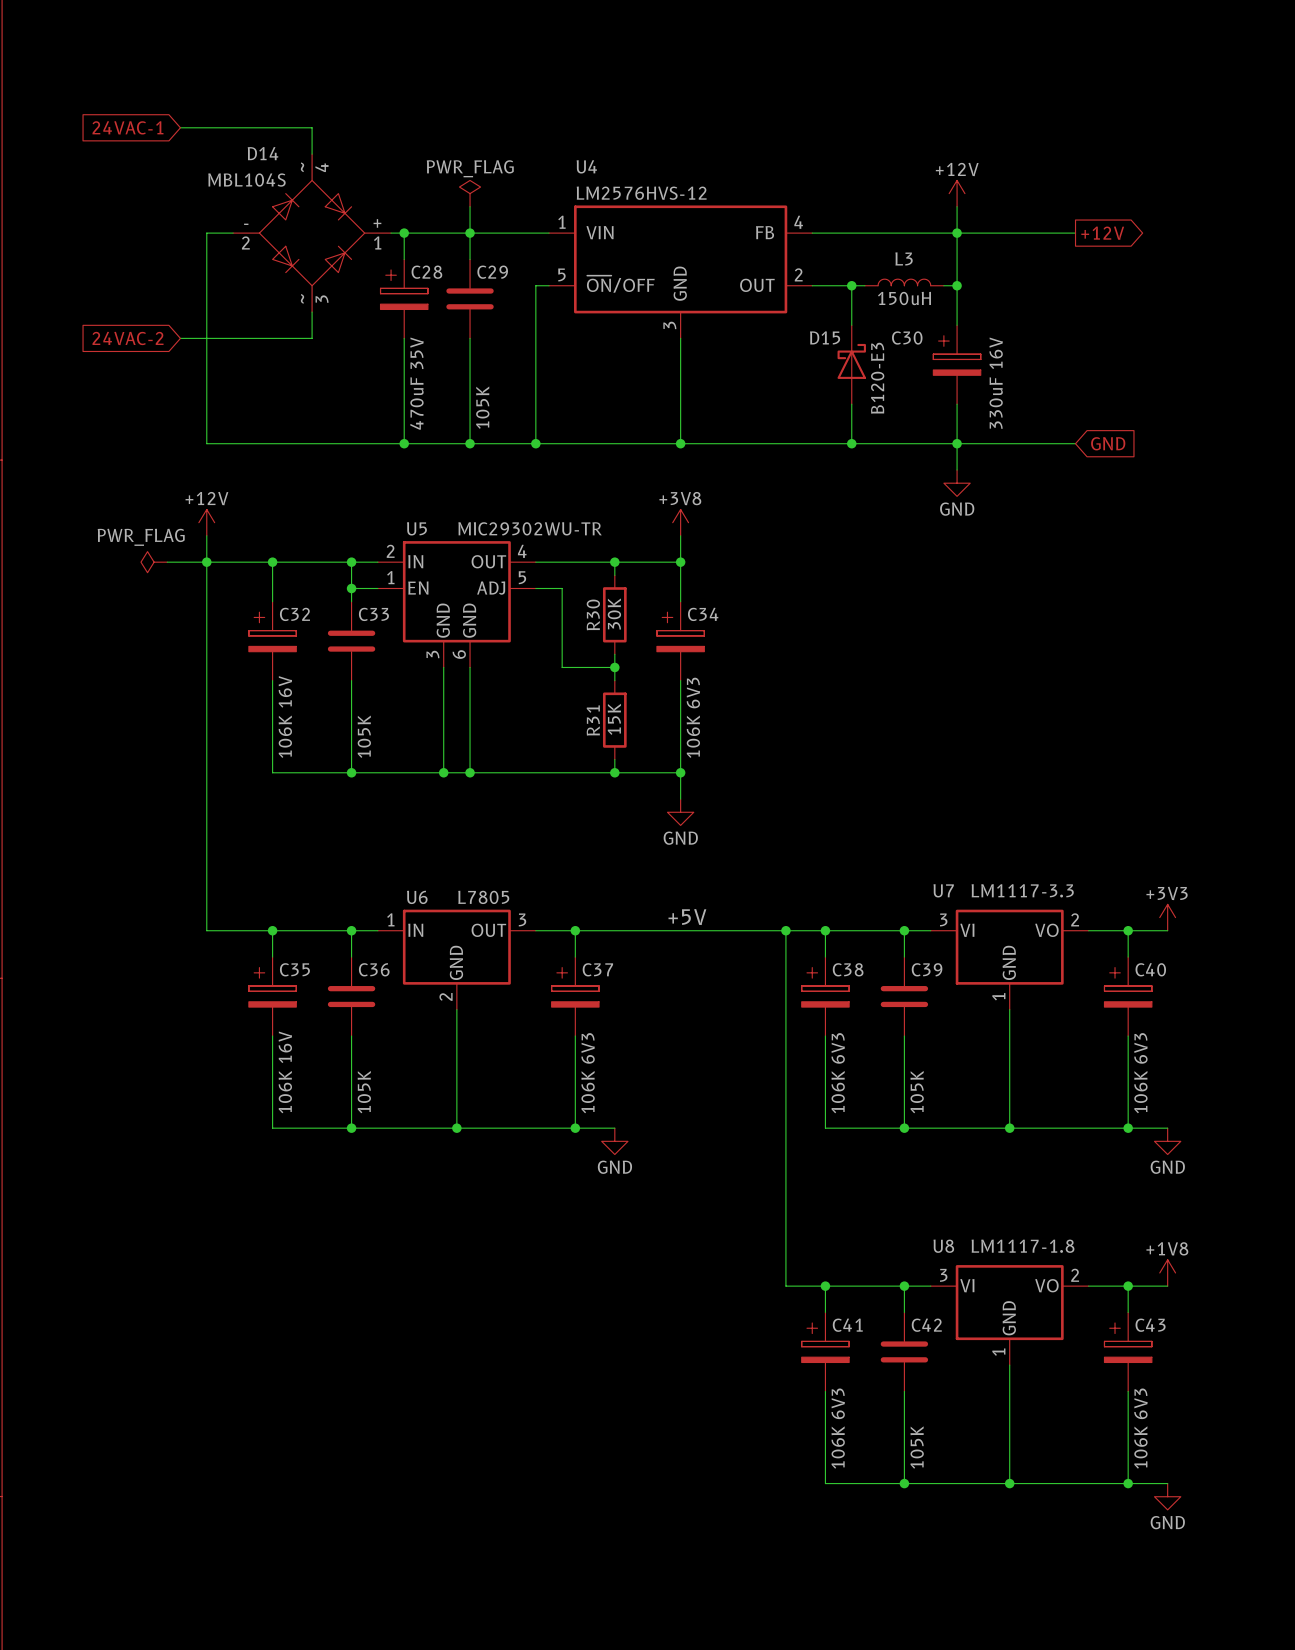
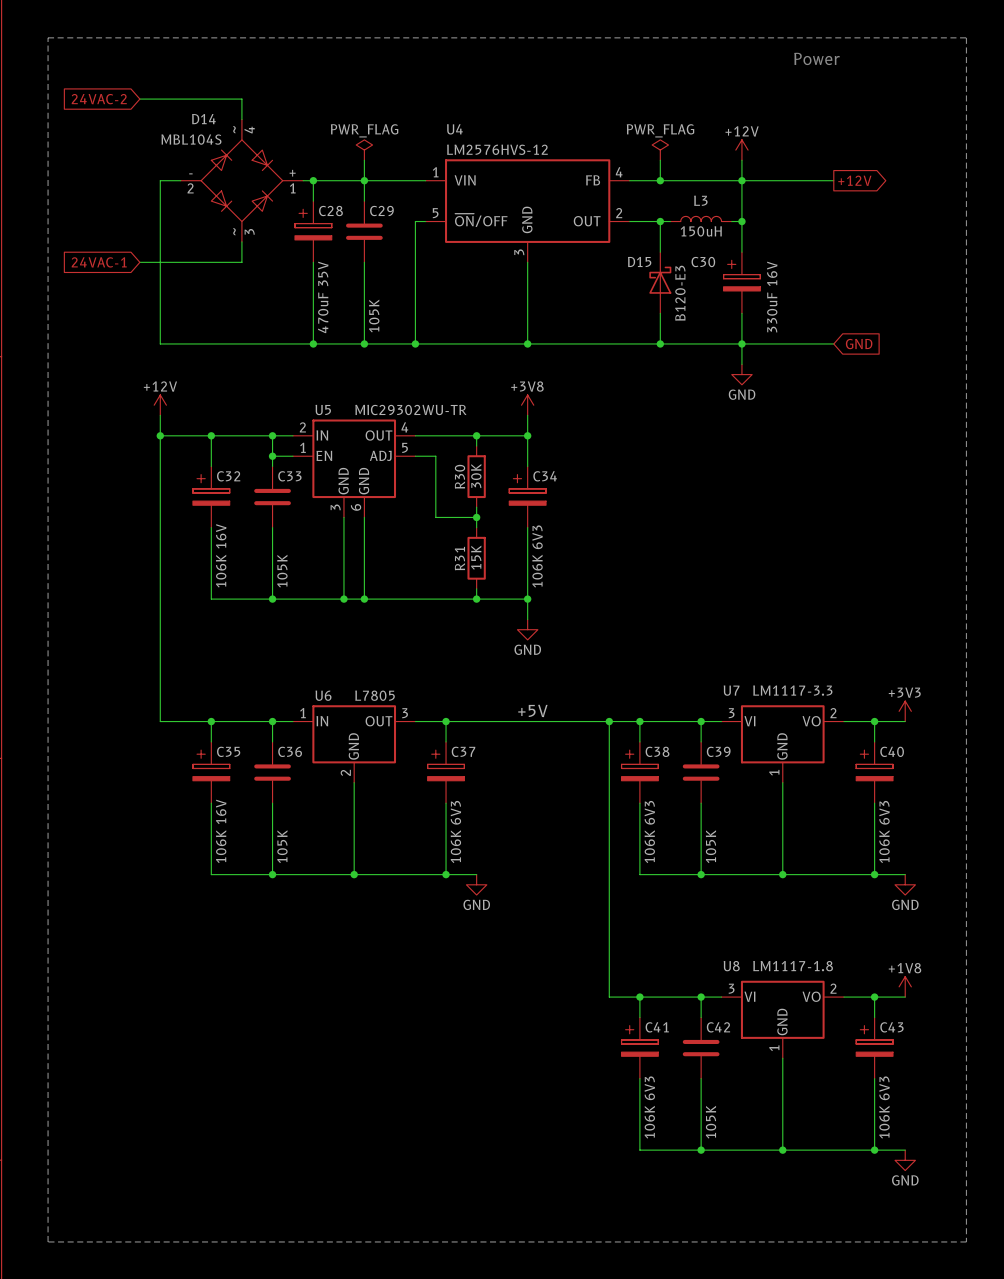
line: none -> (48, 37) (966, 37) (966, 1241) (48, 1241) (48, 37)
text: none -> Power (816, 58)
global label: 24VAC-1 (127, 127) -> 24VAC-2 (99, 99)
power symbol: none -> PWR_FLAG (660, 150)
wire: none -> (660, 160) (660, 180)
junction: none -> (660, 180)
global label: 24VAC-2 (128, 338) -> 24VAC-1 (99, 262)
power symbol: PWR_FLAG (154, 562) -> none
wire: (167, 562) (206, 562) -> none

